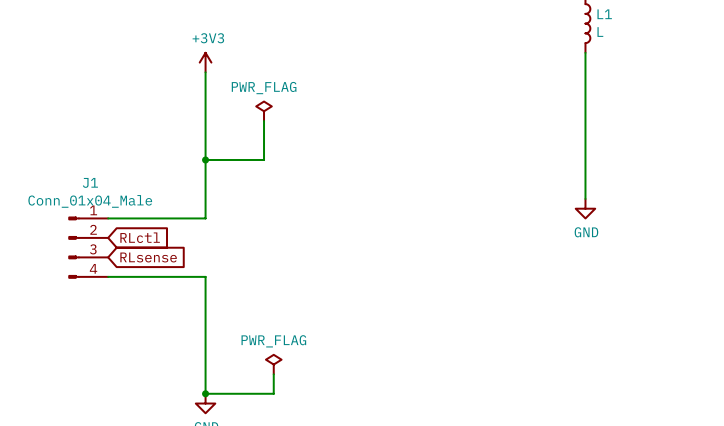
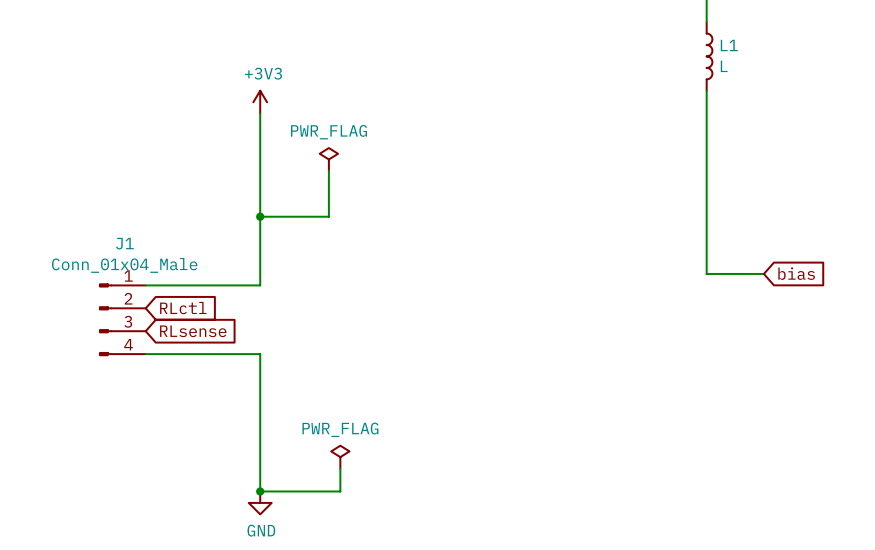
wire: none -> (706, 262) (706, 273) (763, 273)
power symbol: GND (585, 208) -> none
global label: none -> bias (796, 273)

